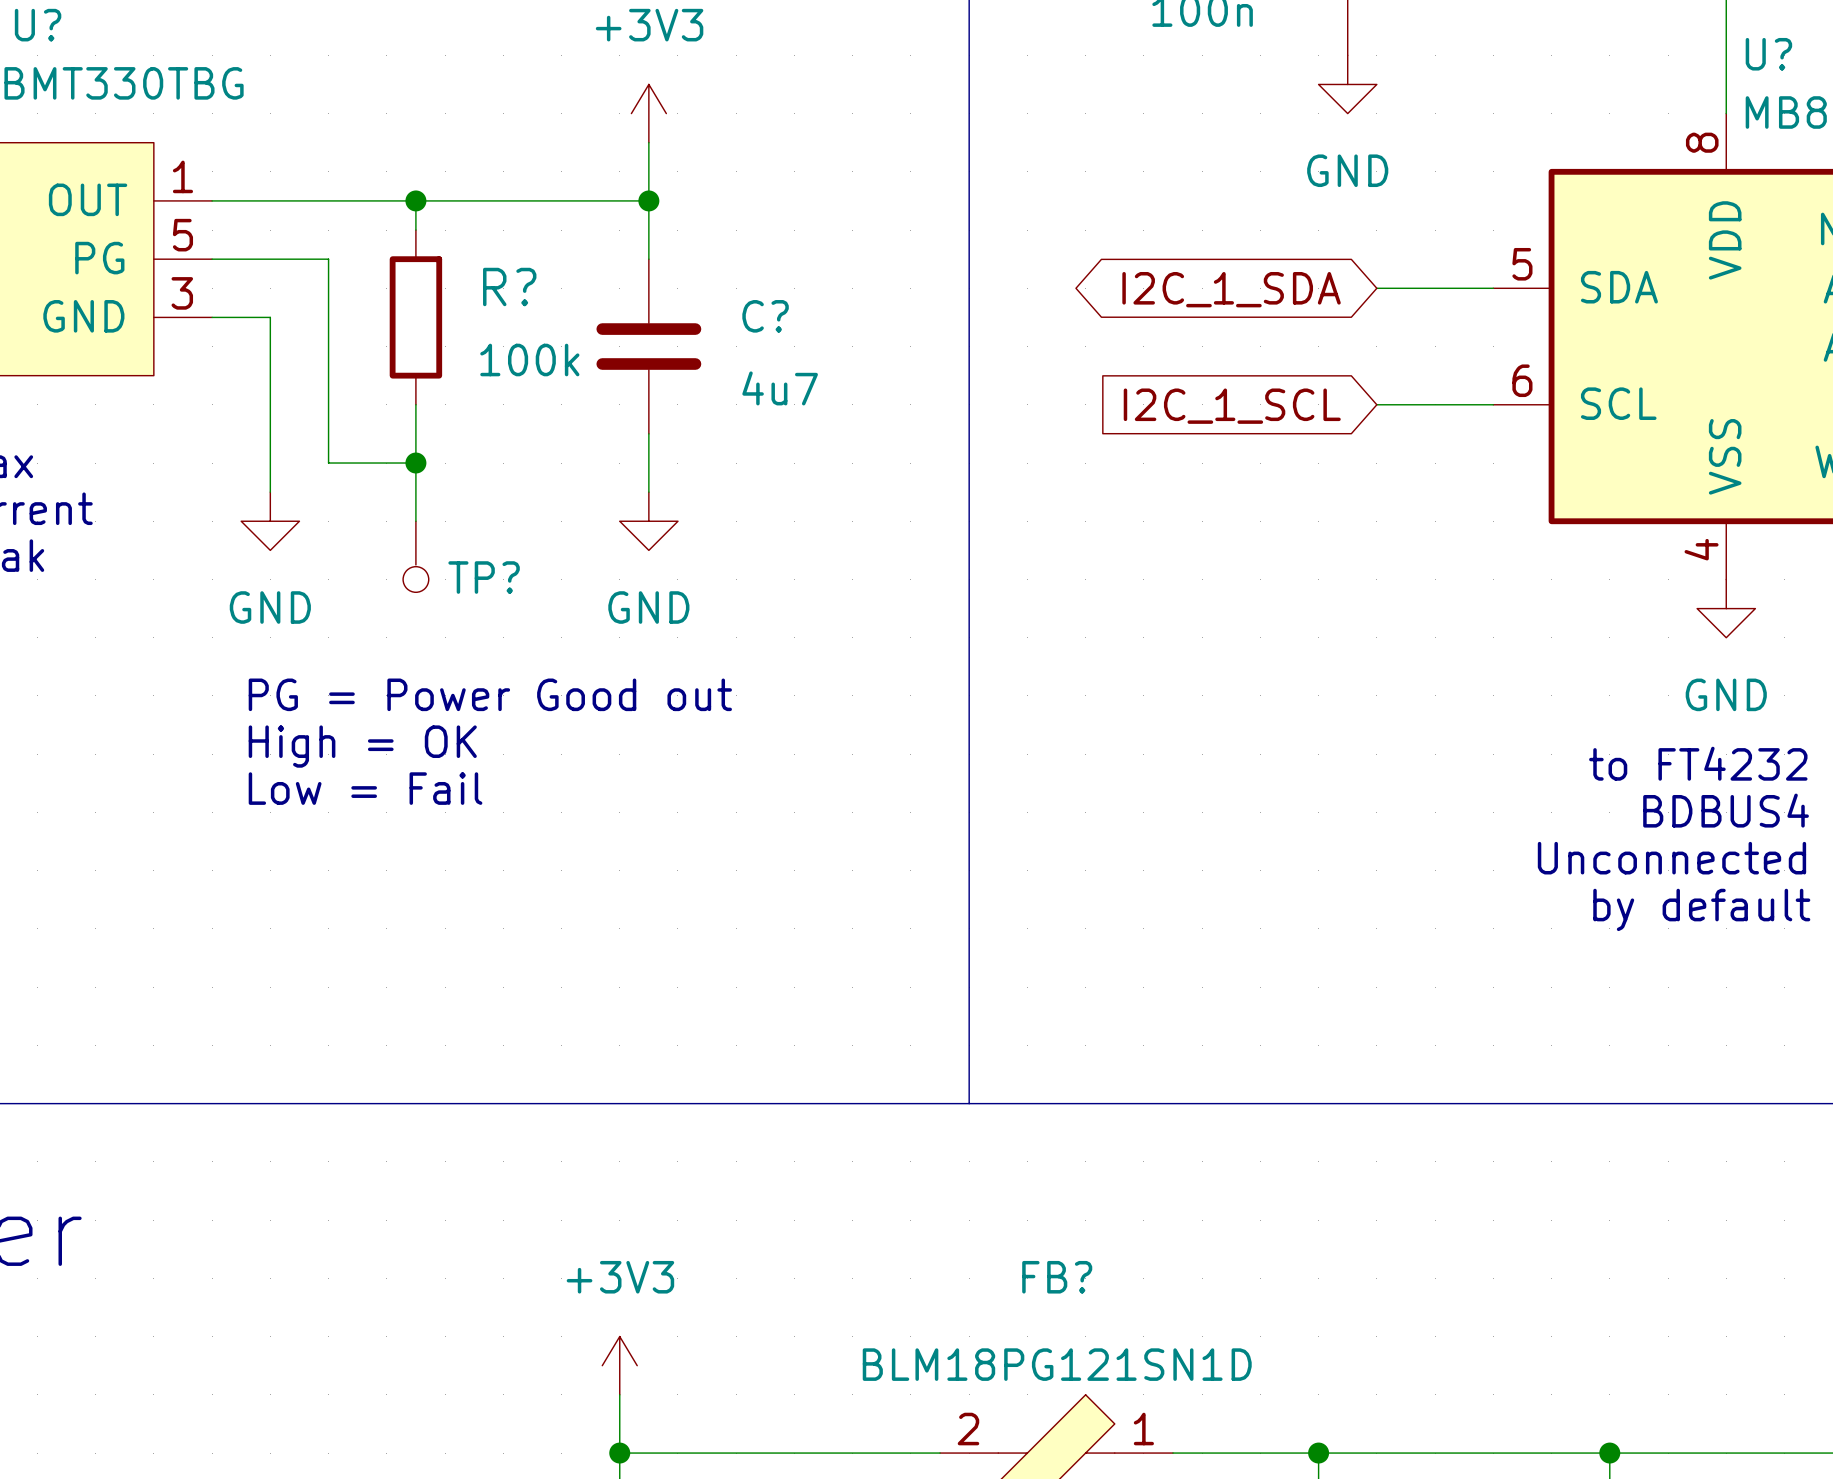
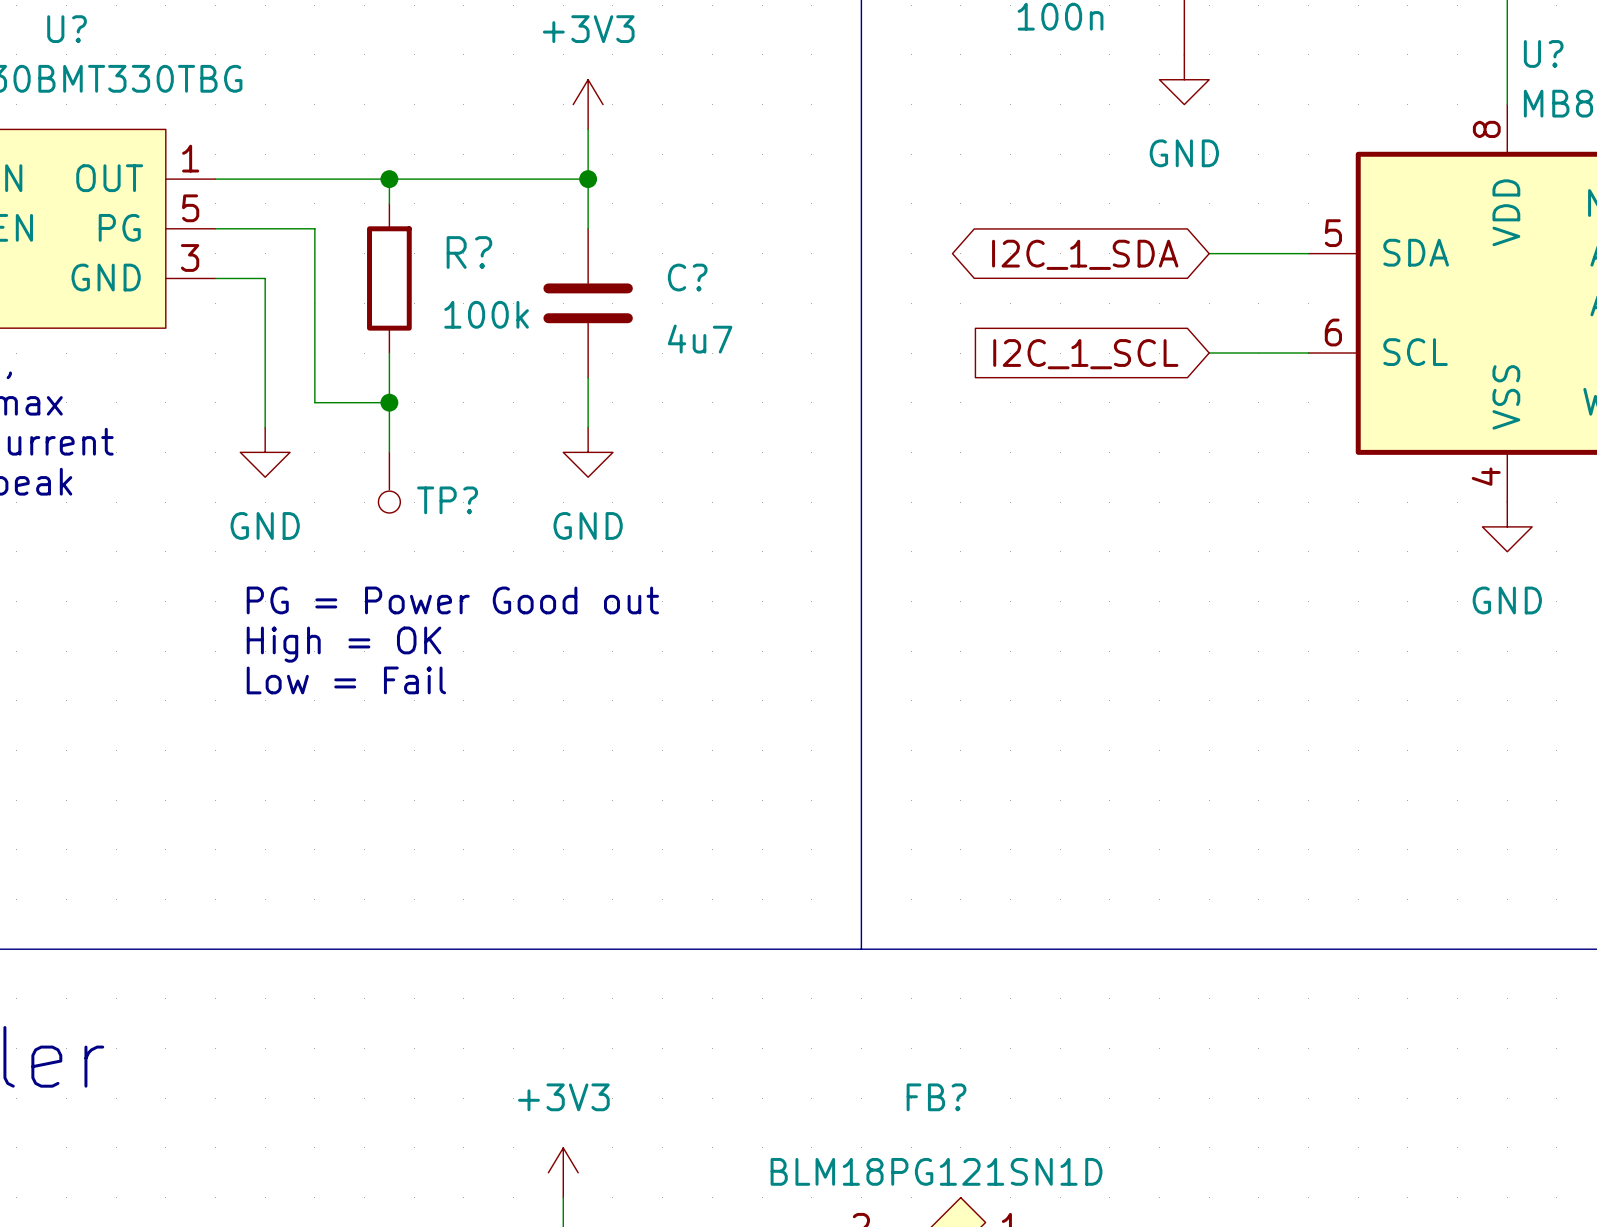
text: to FT4232 (1698, 763) -> none
text: BDBUS4 (1726, 810) -> none
text: Unconnected (1671, 858) -> none
text: by default (1701, 909) -> none

